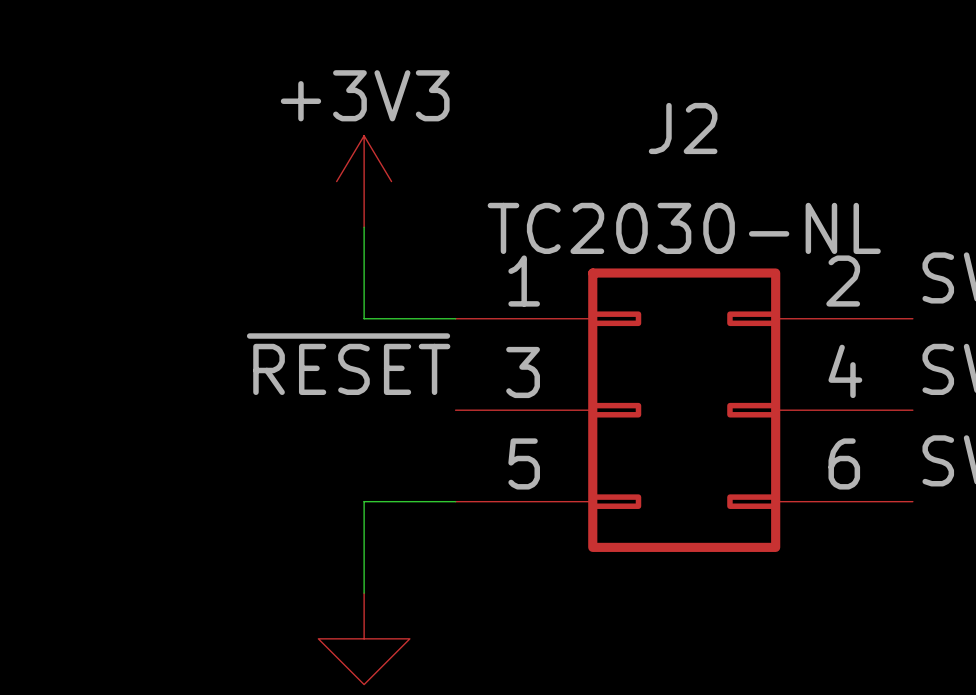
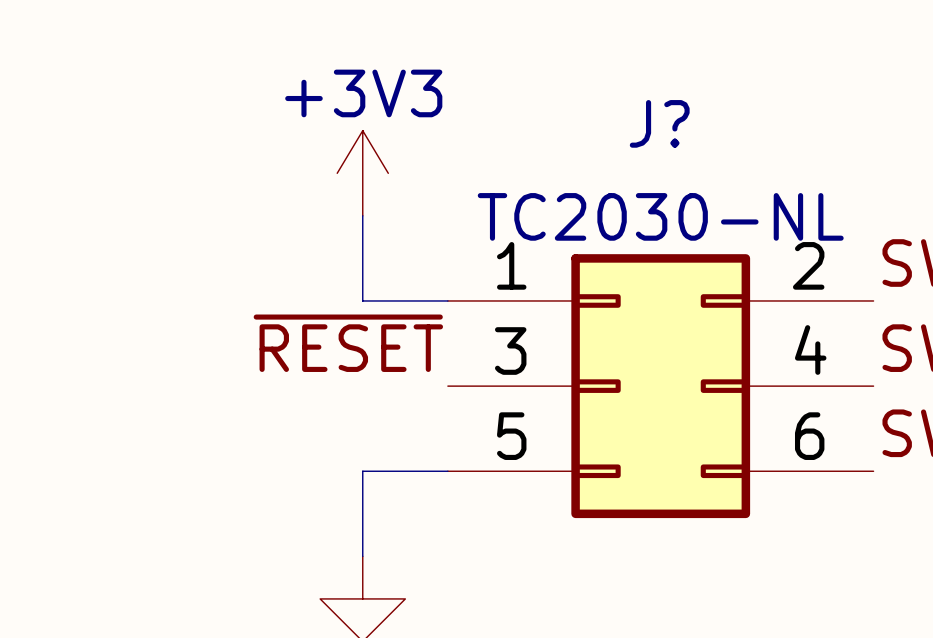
J2 name: J2 (683, 128) -> J? (659, 123)

